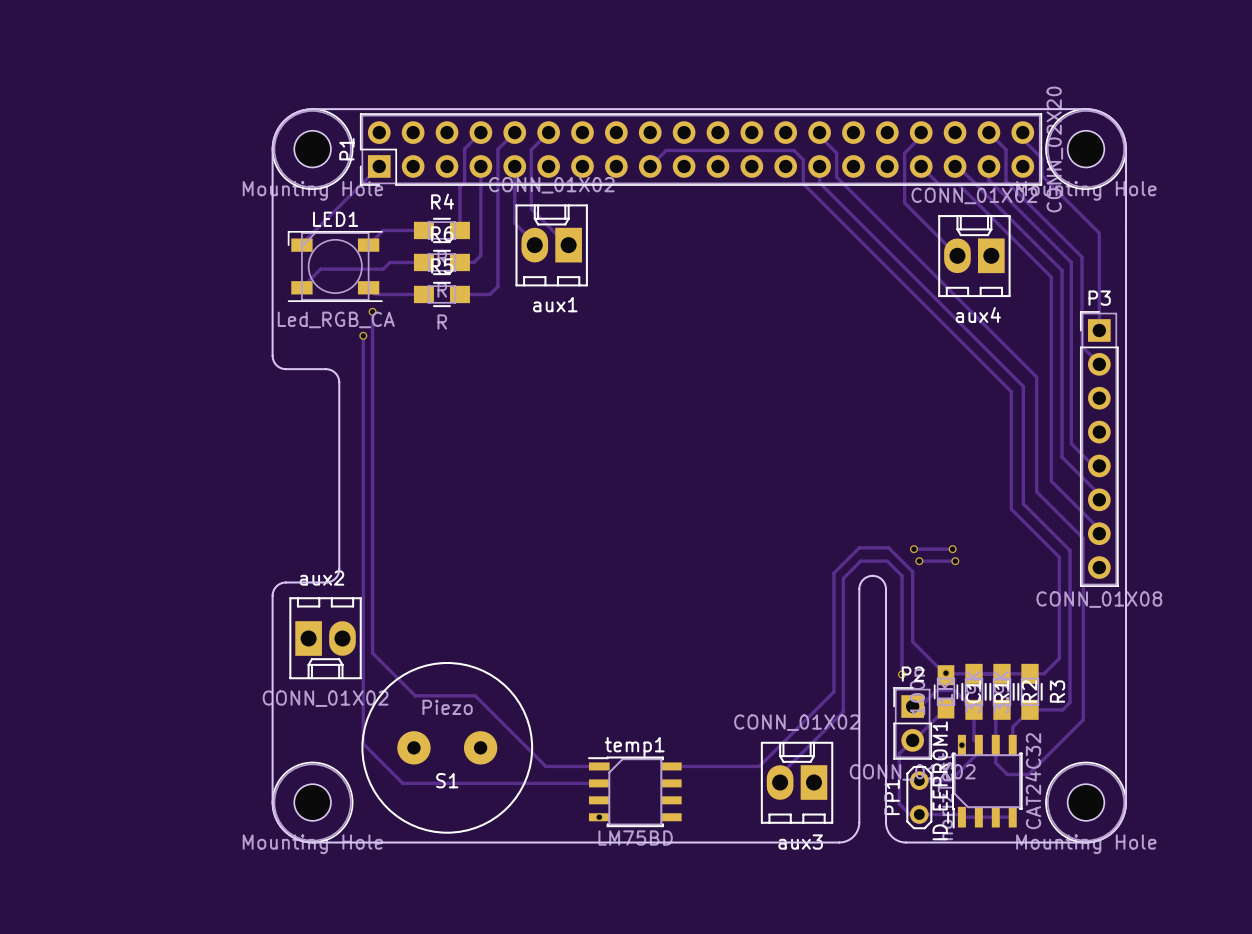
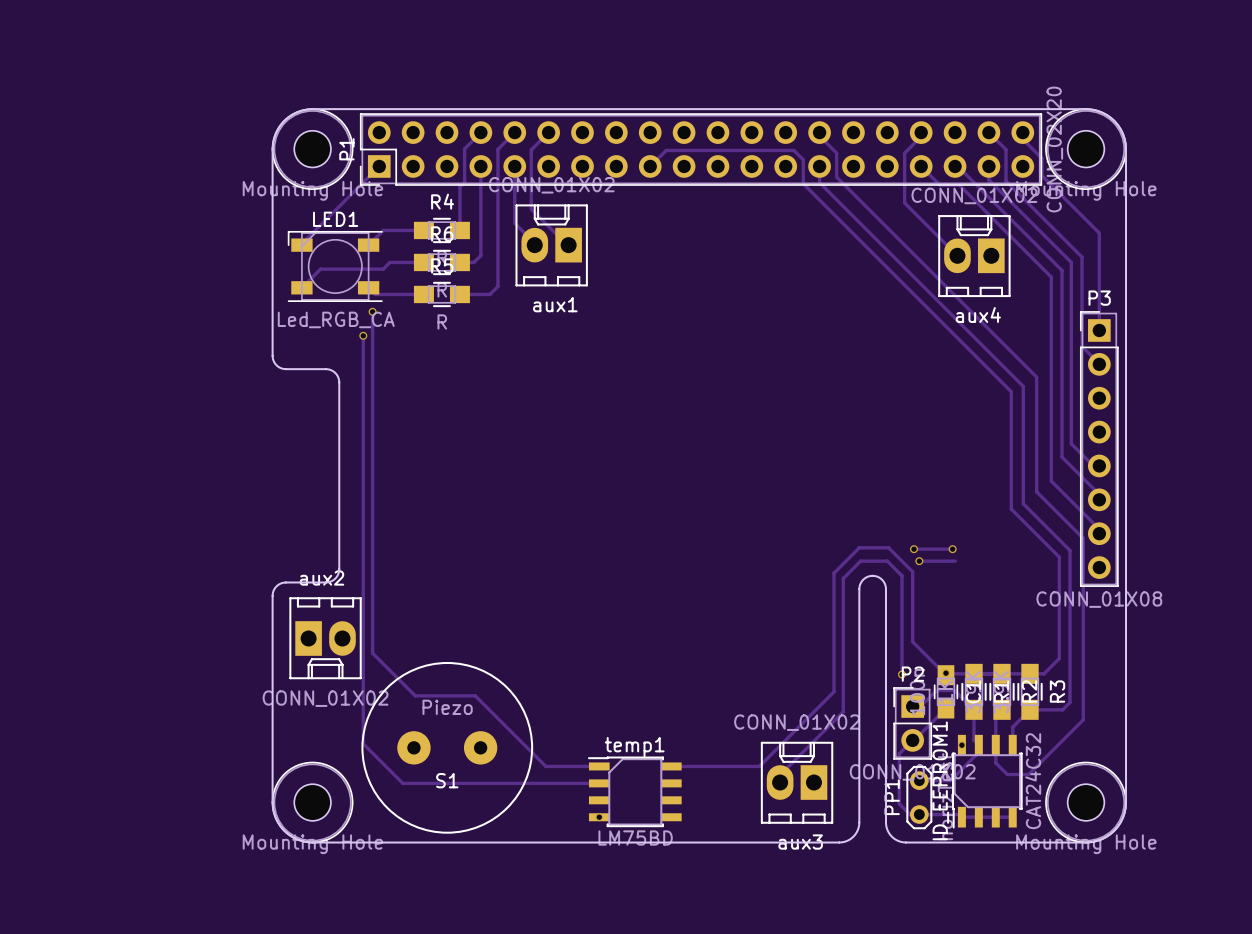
via: (955, 561) -> none

